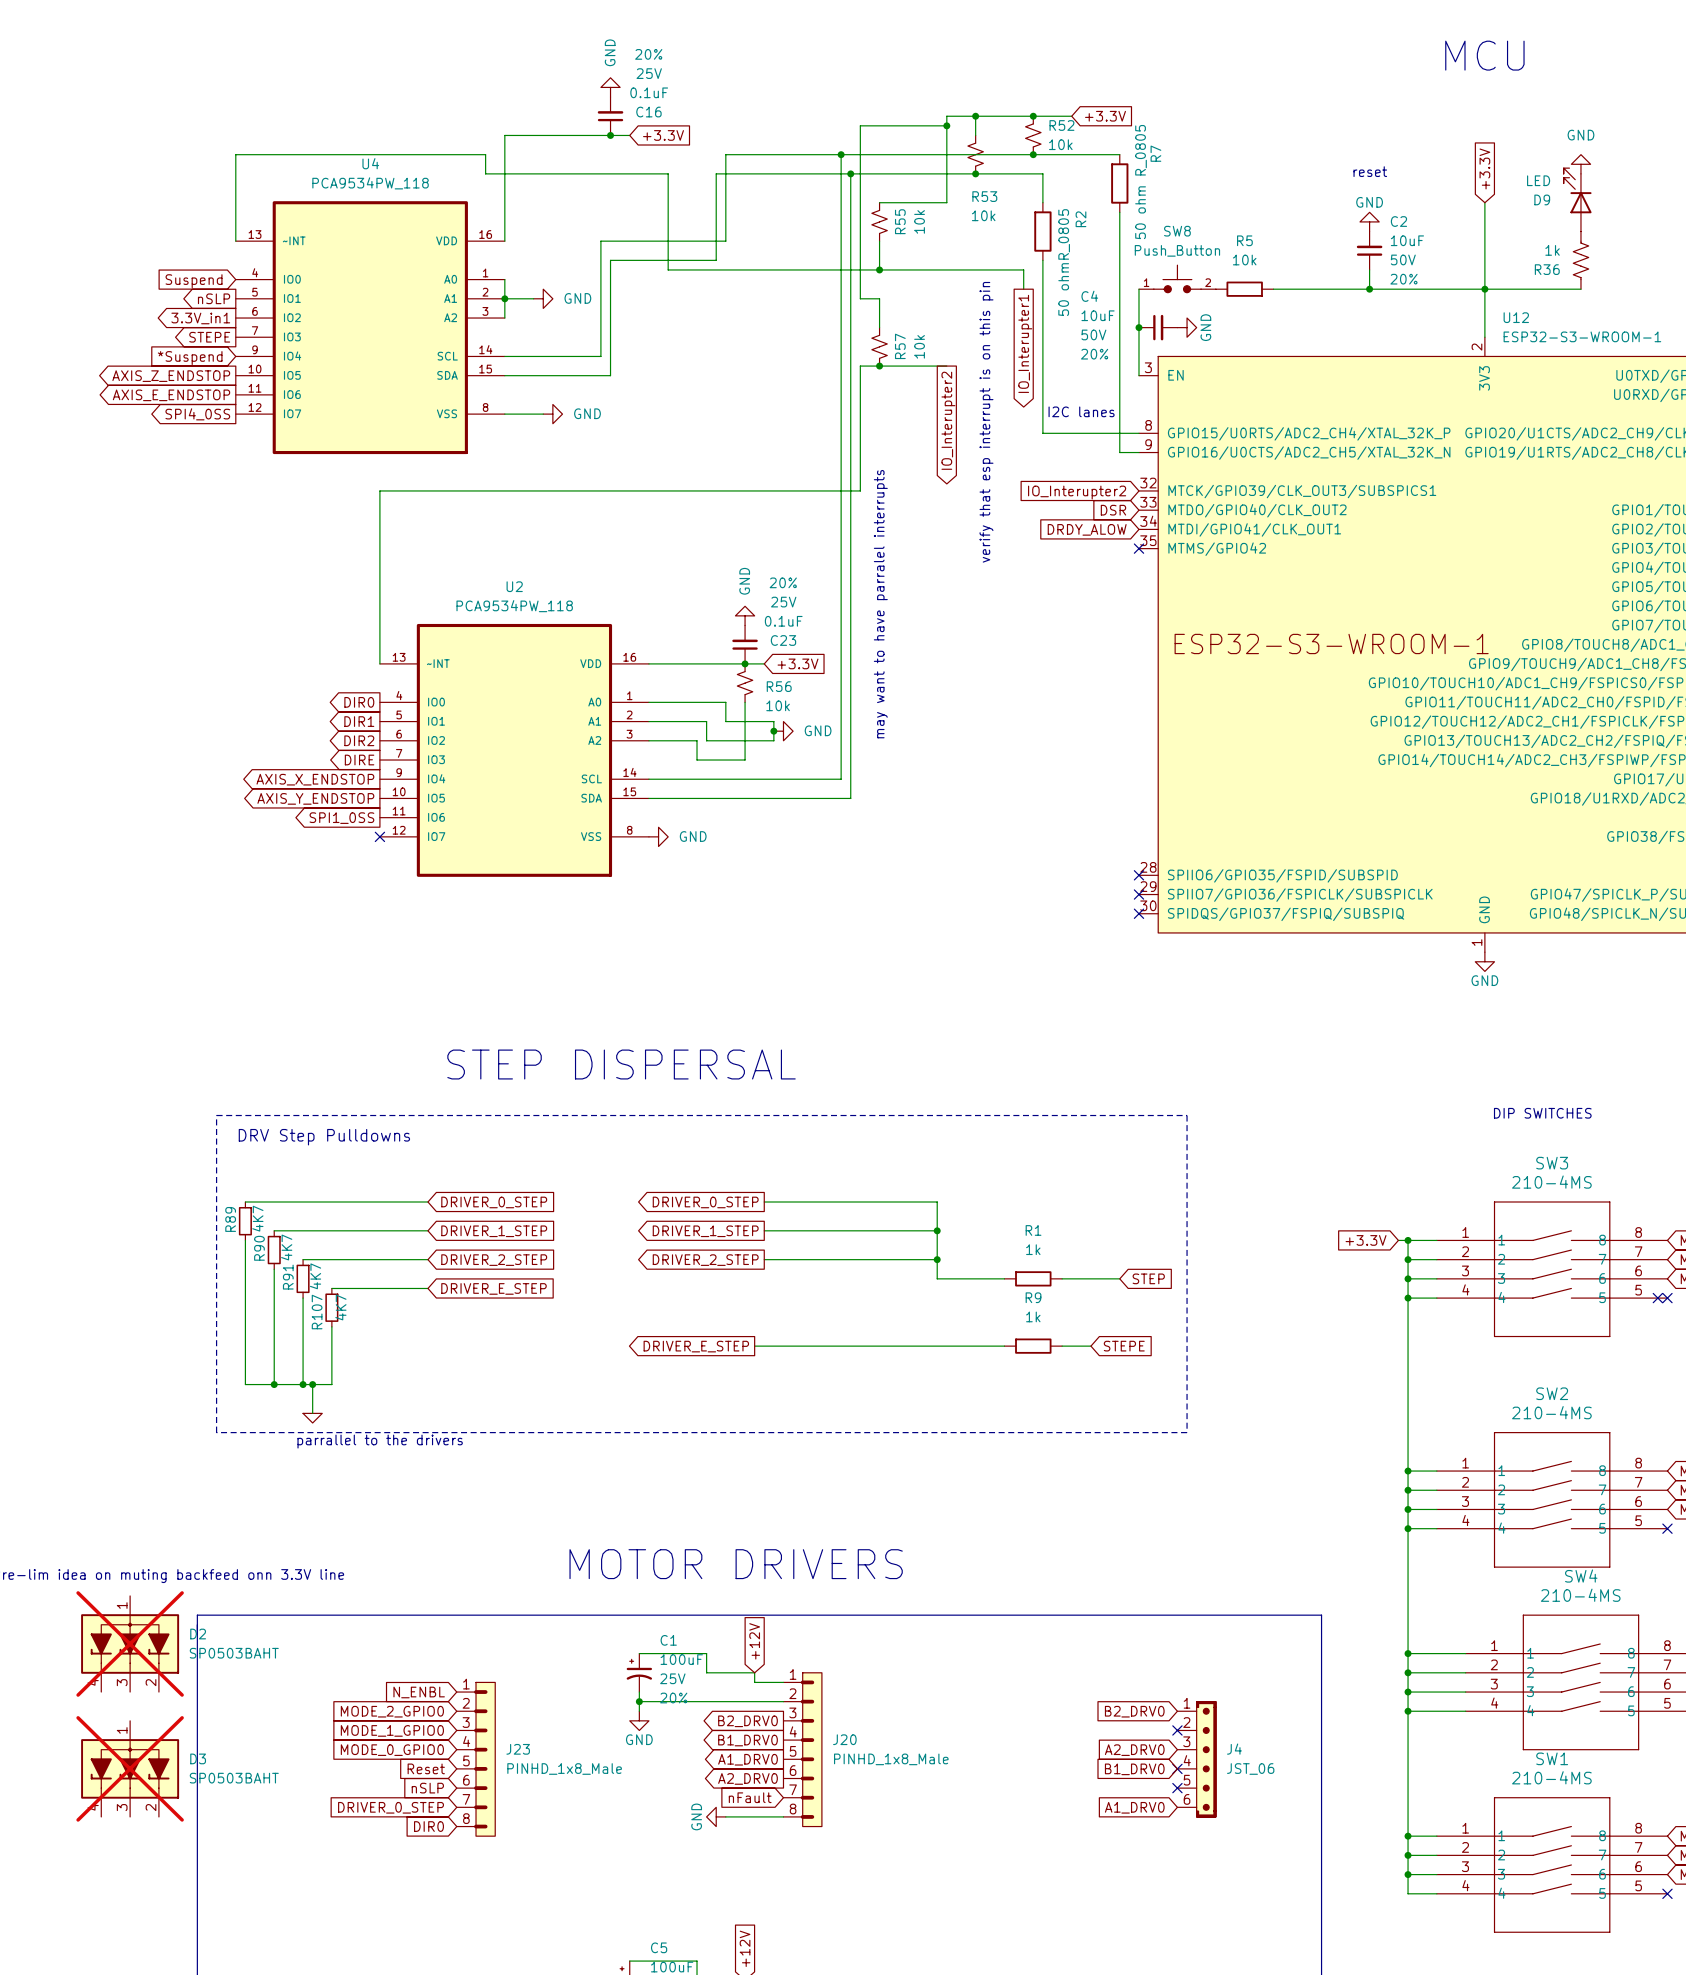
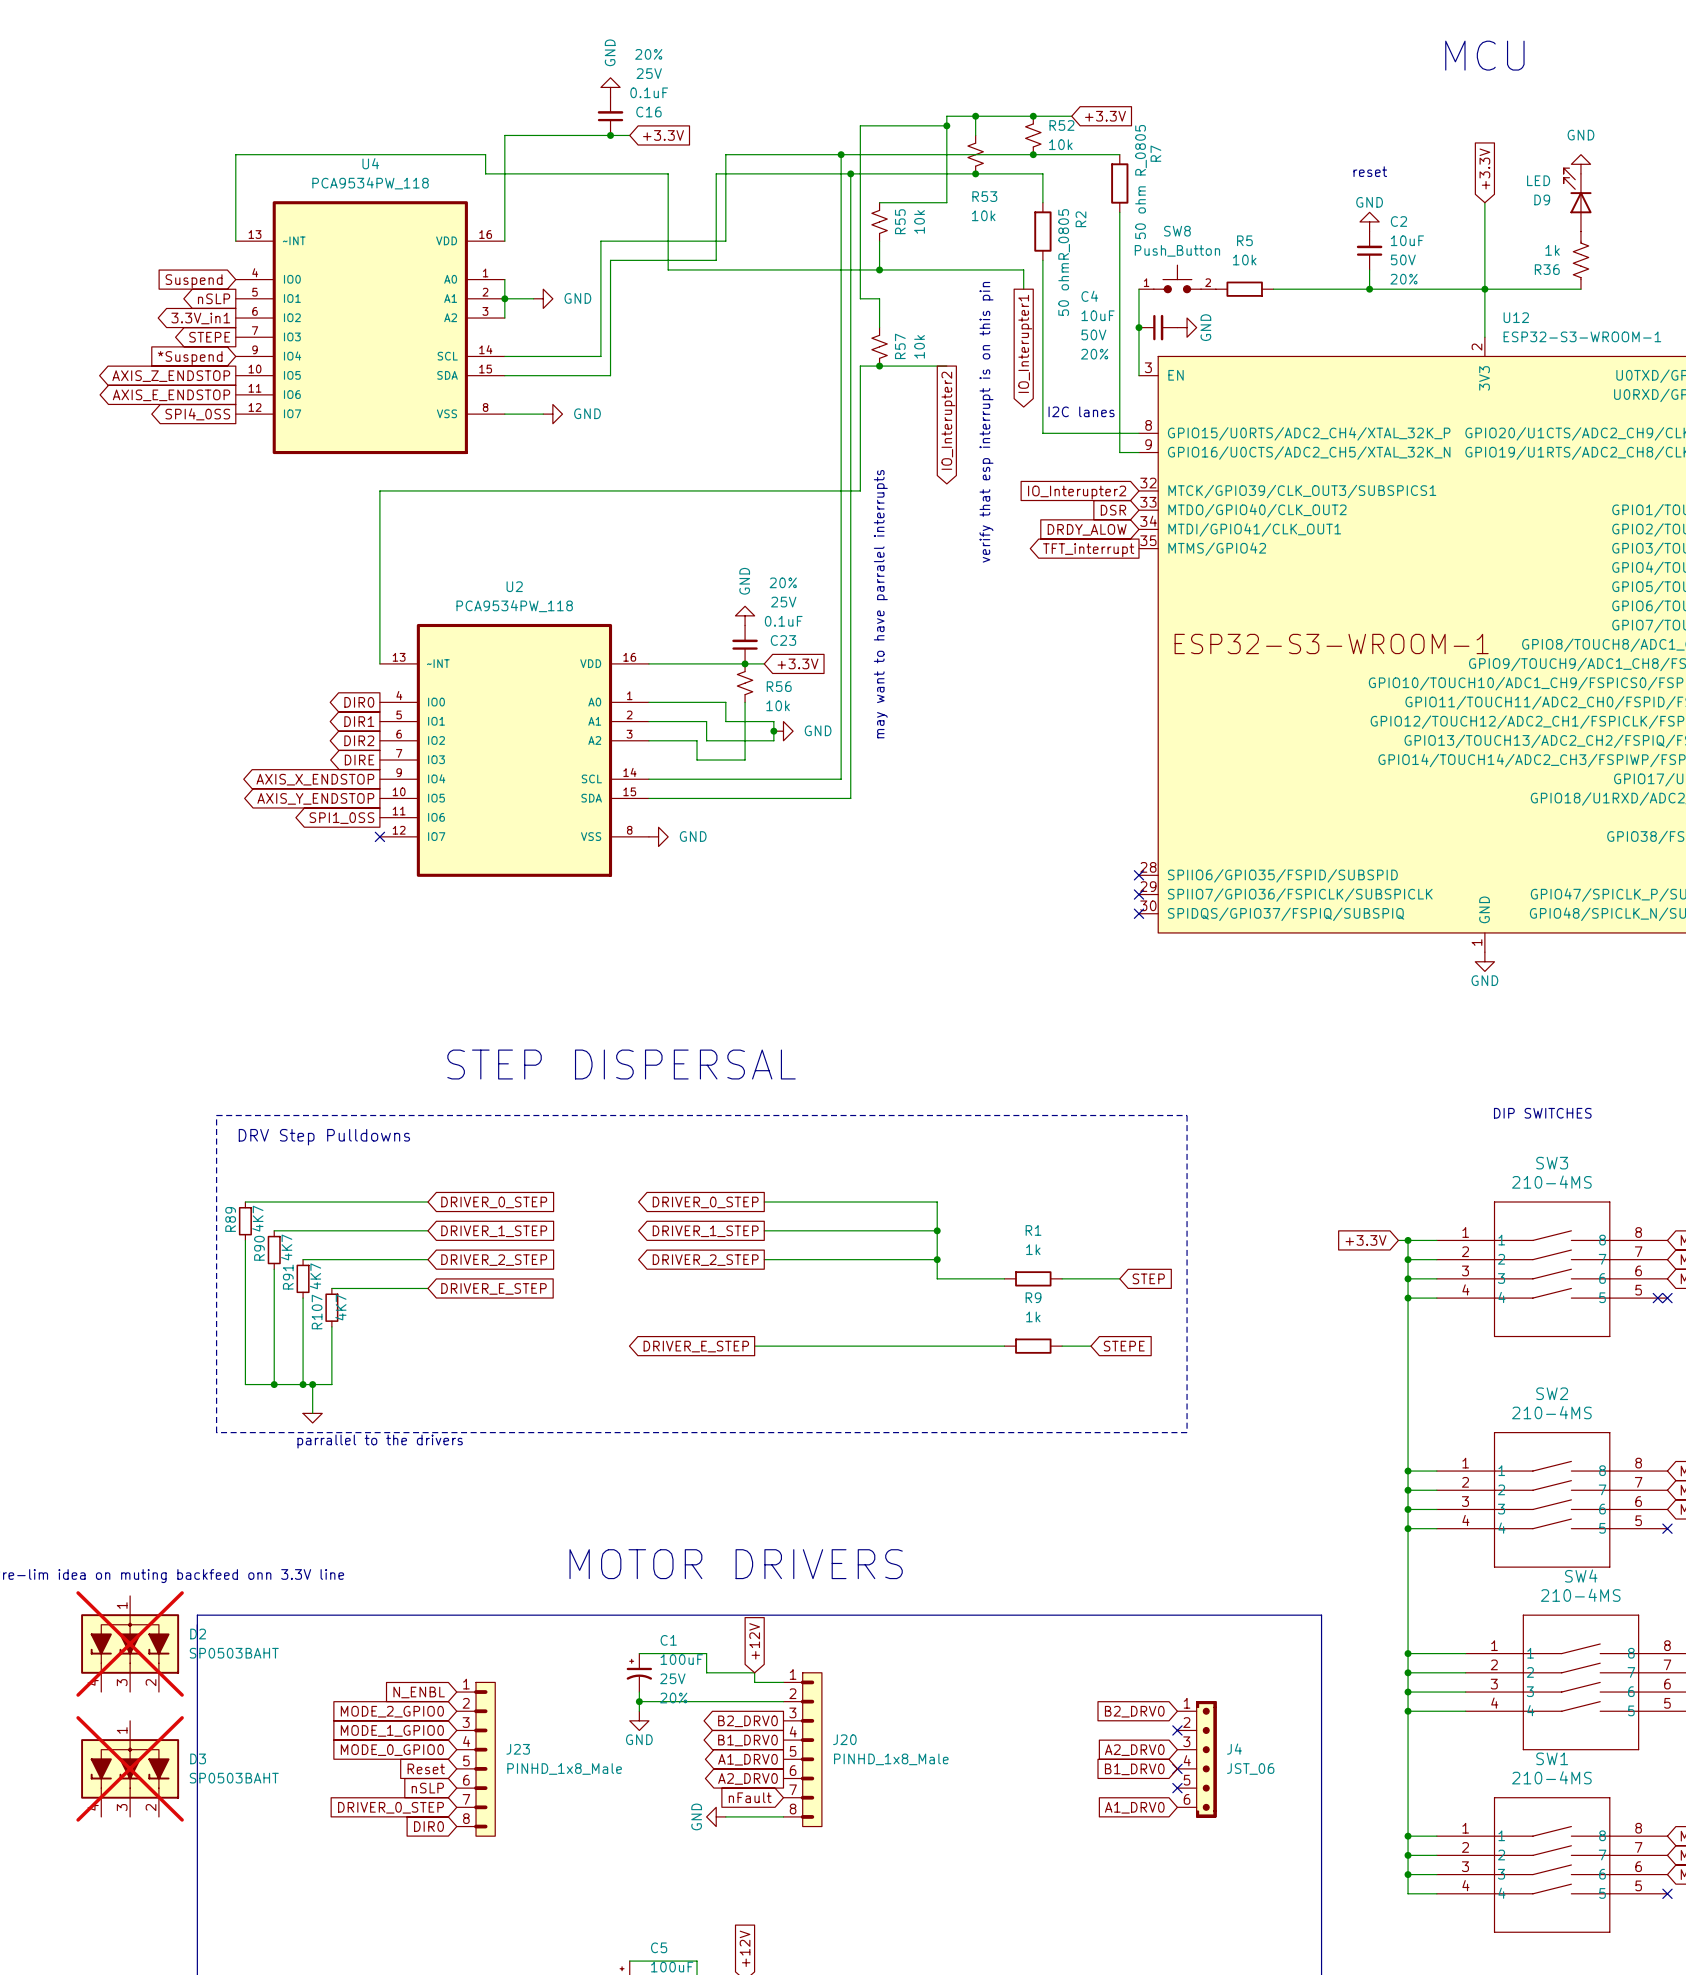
no-connect mark: (1138, 548) -> none
global label: none -> TFT_interrupt (1088, 550)

